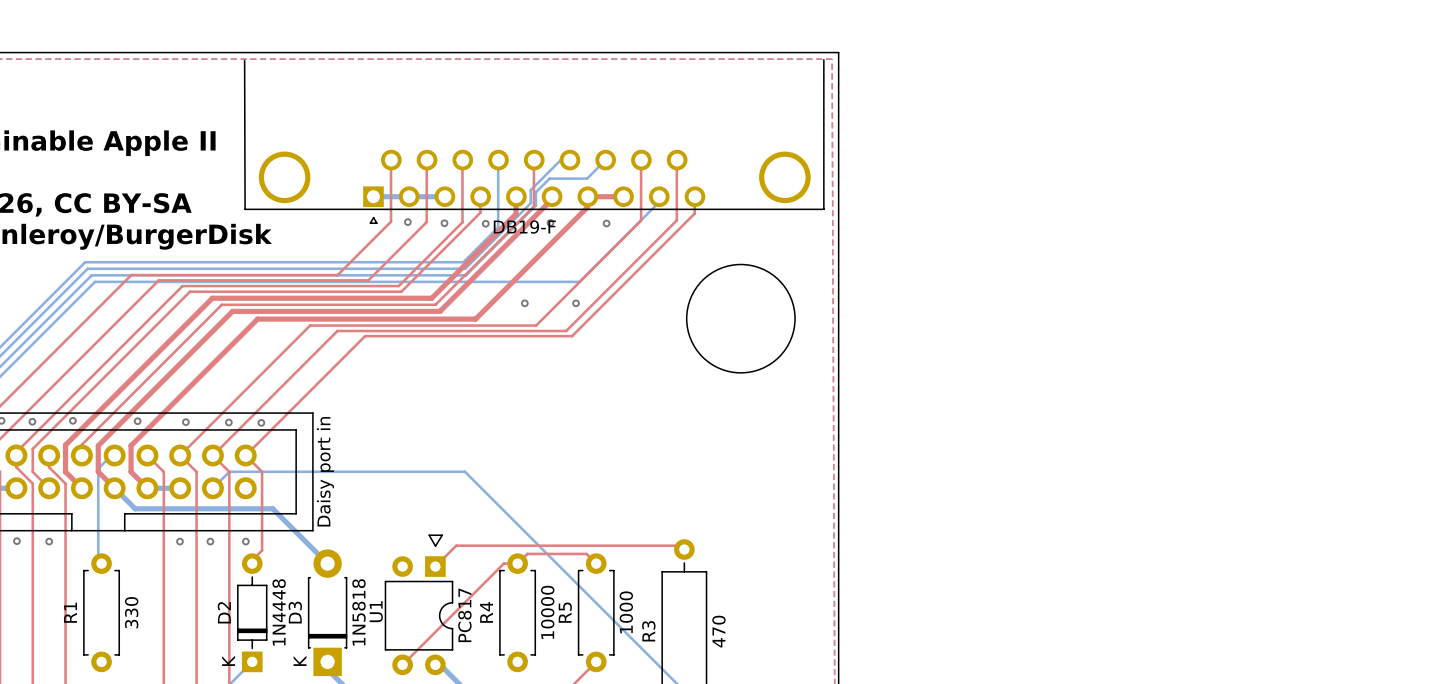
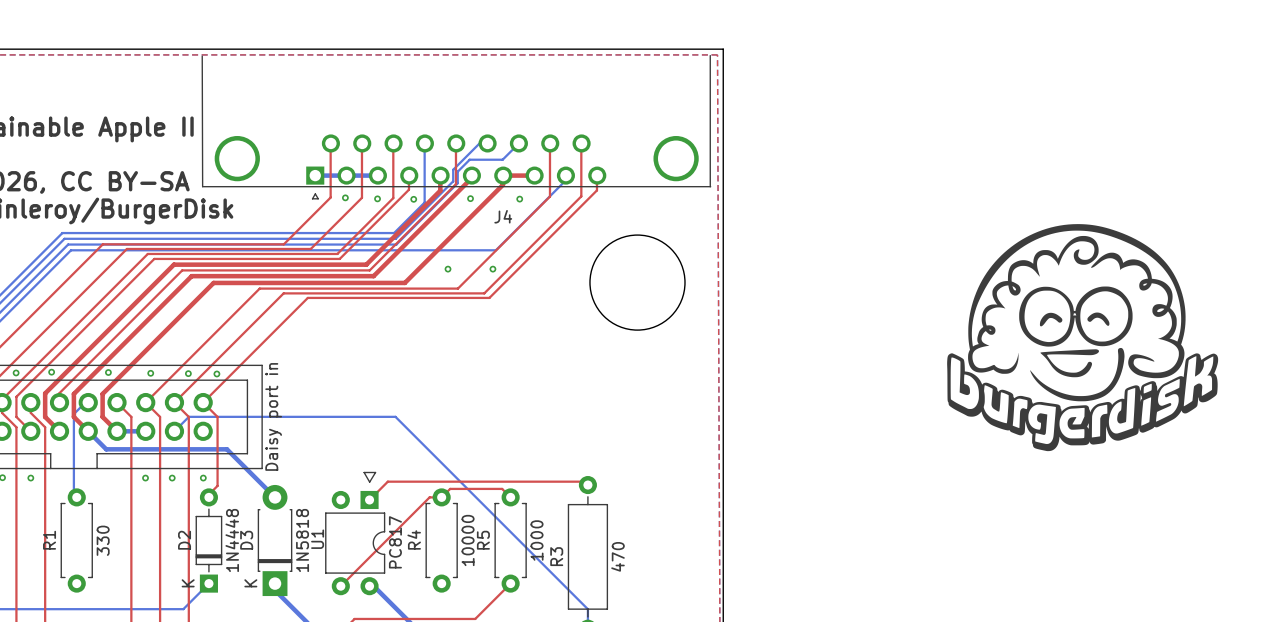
text: DB19-F (524, 227) -> none
J4 name: none -> J4 (503, 216)
drawing: none -> [947, 224, 1219, 452]

